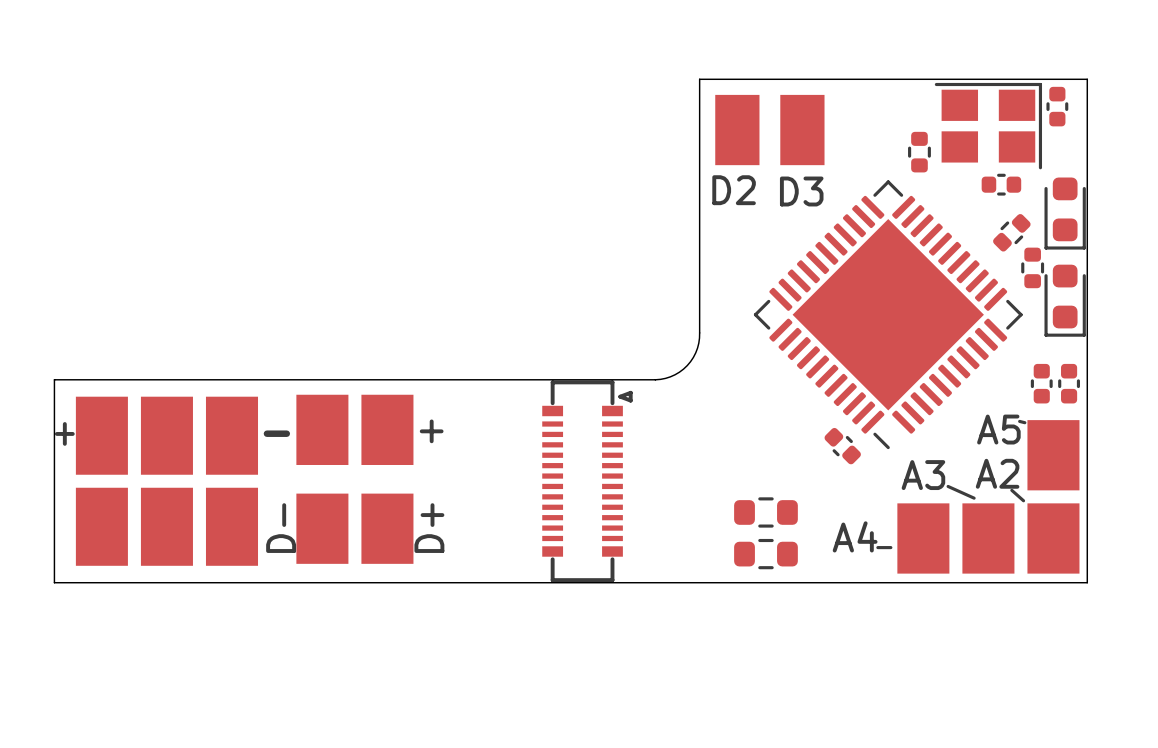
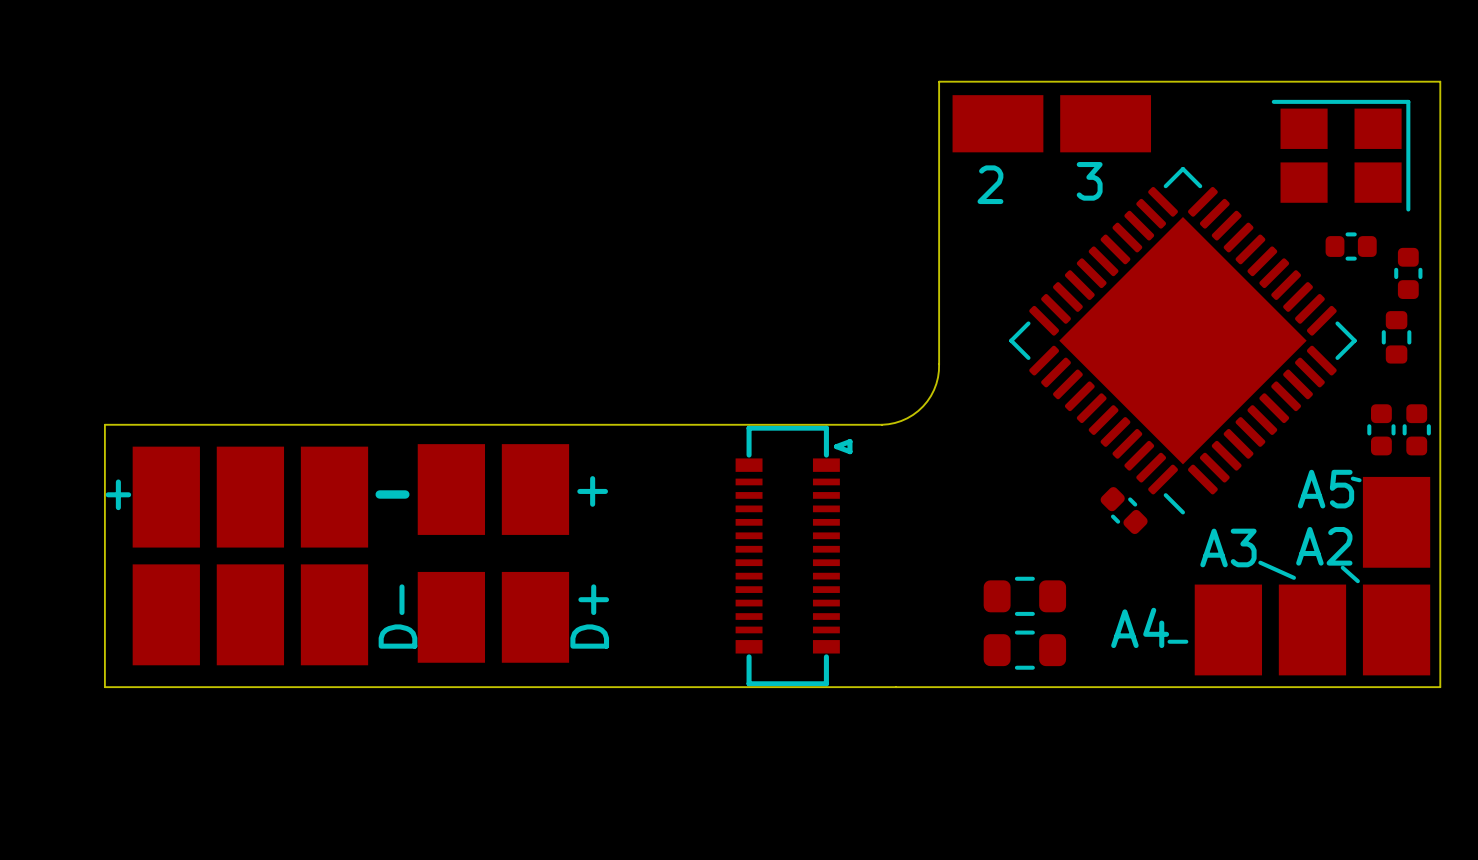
part footprint: [715, 94, 825, 166] -> [952, 95, 1152, 153]
part position: (1057, 106) -> (1408, 273)
board edge: (699, 114) (699, 79) (1087, 79) (1087, 114) -> (939, 81) (1440, 81)
part: (988, 126) -> none
part: (919, 152) -> none
part footprint: [981, 173, 1022, 196] -> [1271, 99, 1411, 212]
text: D2 (734, 190) -> 2 (990, 184)
text: D3 (801, 191) -> 3 (1089, 181)
part: (1065, 213) -> none
part footprint: [993, 214, 1031, 252] -> [1325, 232, 1377, 261]
part footprint: [1044, 264, 1086, 337] -> [1381, 311, 1412, 364]
part: (1032, 267) -> none

